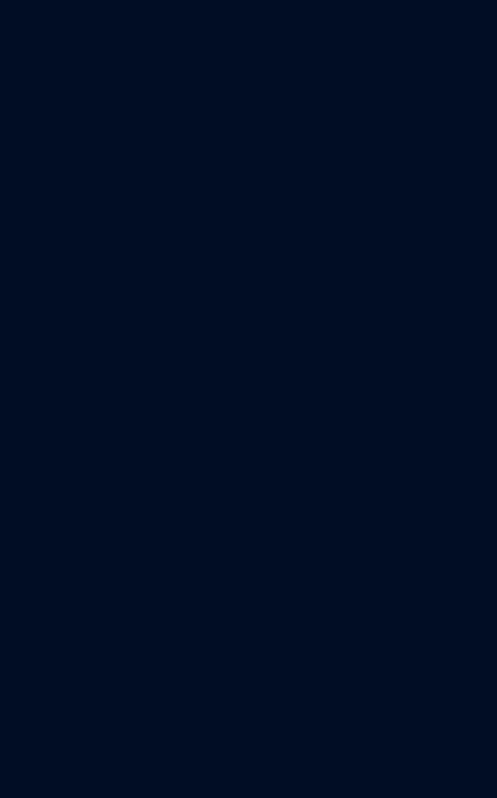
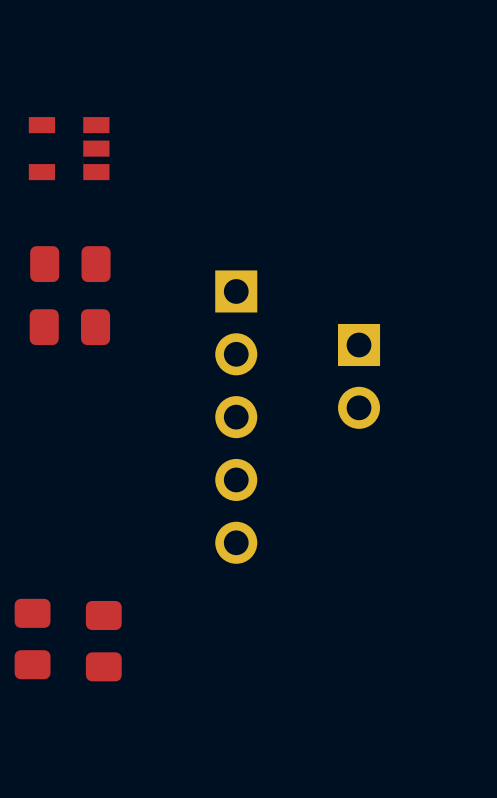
part: none -> (69, 148)
part: none -> (70, 264)
part: none -> (69, 327)
part: none -> (359, 376)
part: none -> (236, 417)
part: none -> (32, 639)
part: none -> (103, 641)

